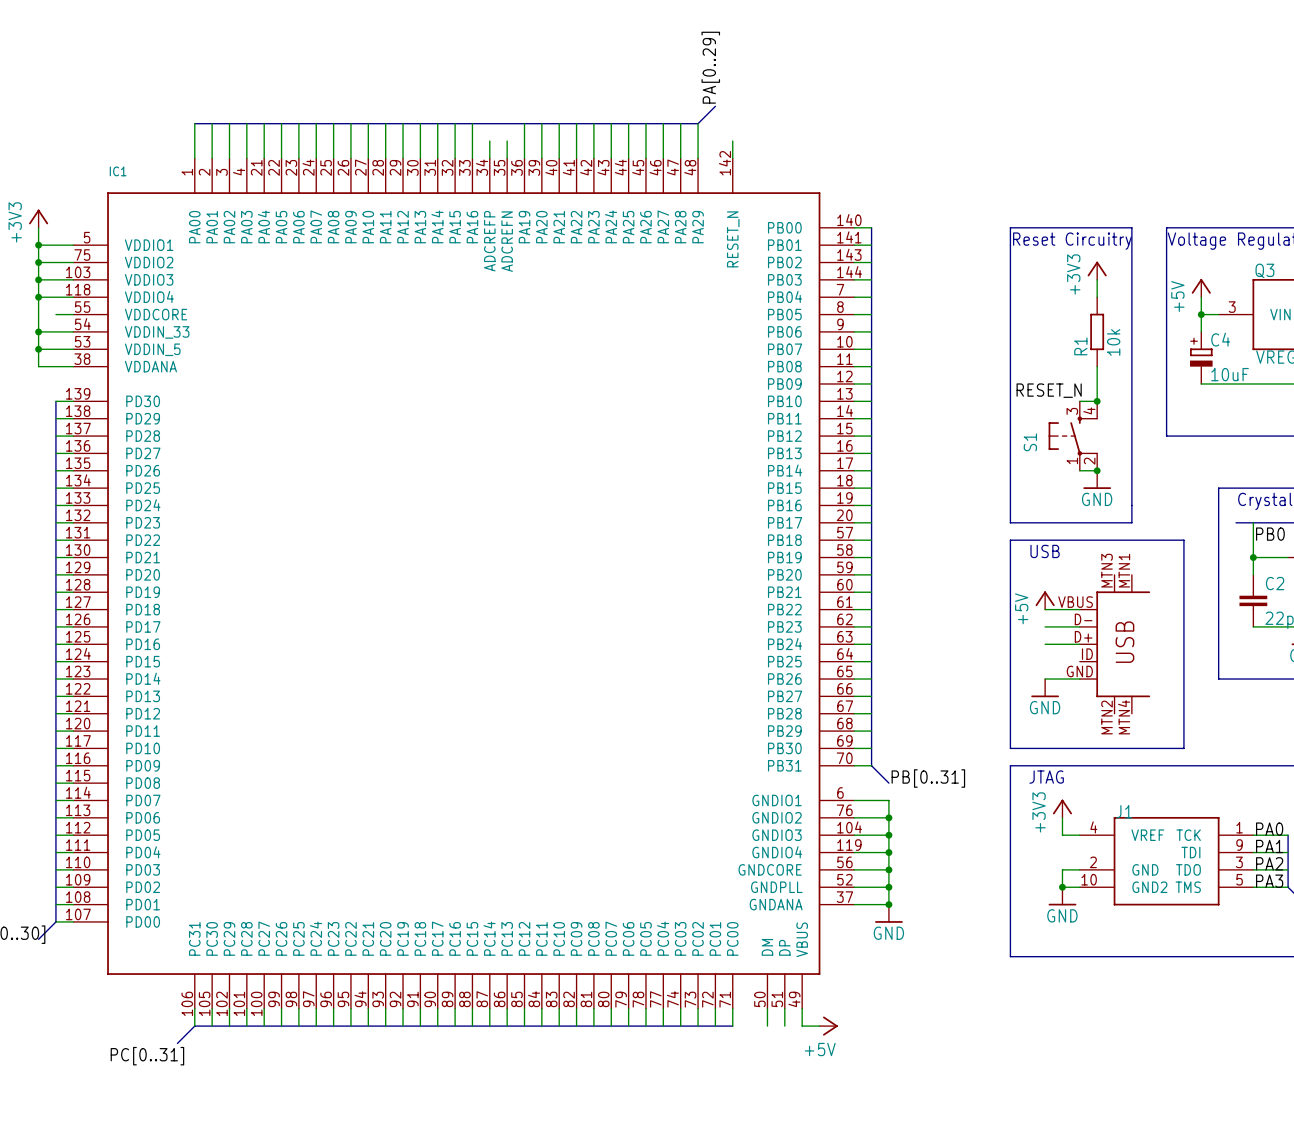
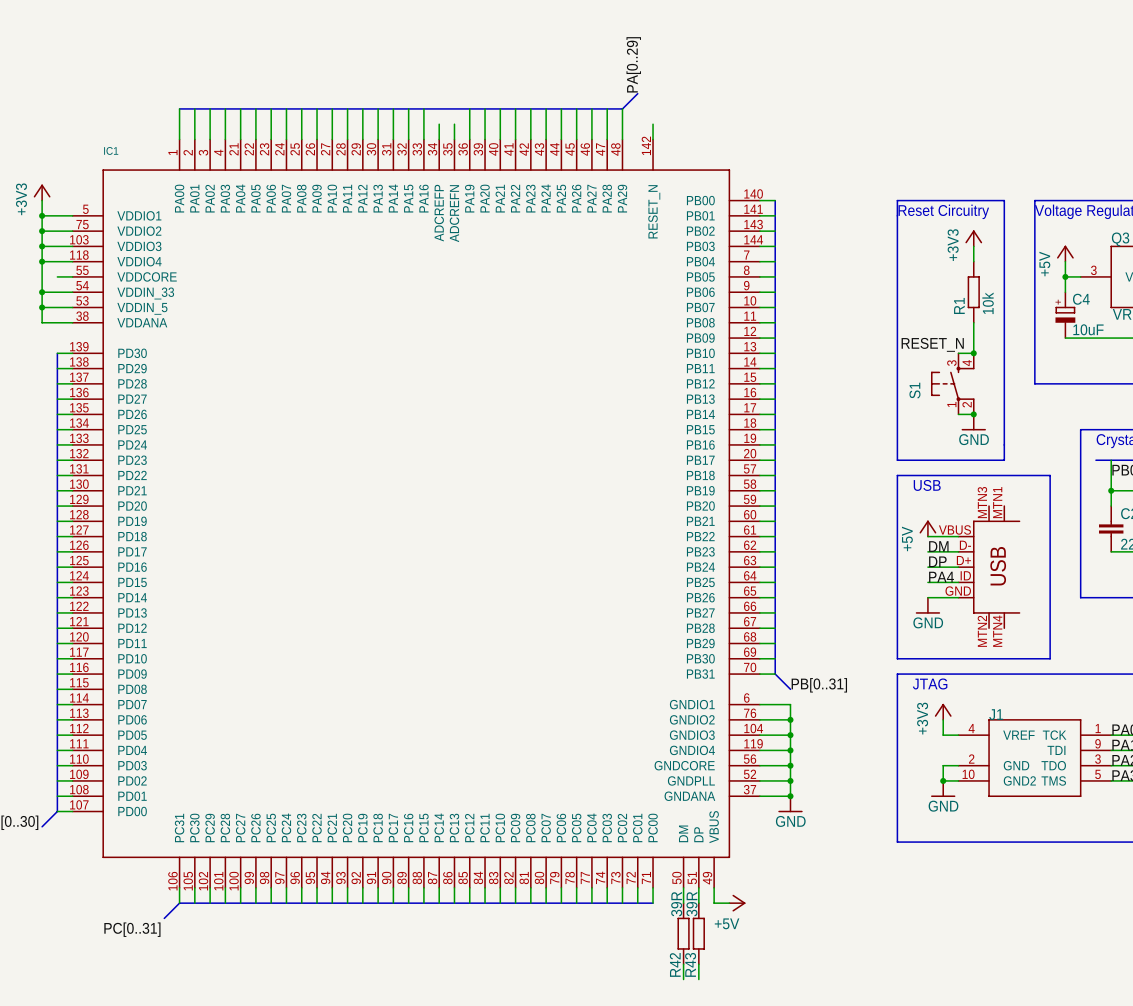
label: none -> DM (938, 546)
label: none -> DP (937, 561)
label: none -> PA4 (941, 577)
wire: none -> (927, 582) (958, 582)
R42: none -> 39R (683, 933)
R43: none -> 39R (698, 933)
wire: none -> (683, 964) (683, 979)
wire: none -> (698, 964) (698, 979)

